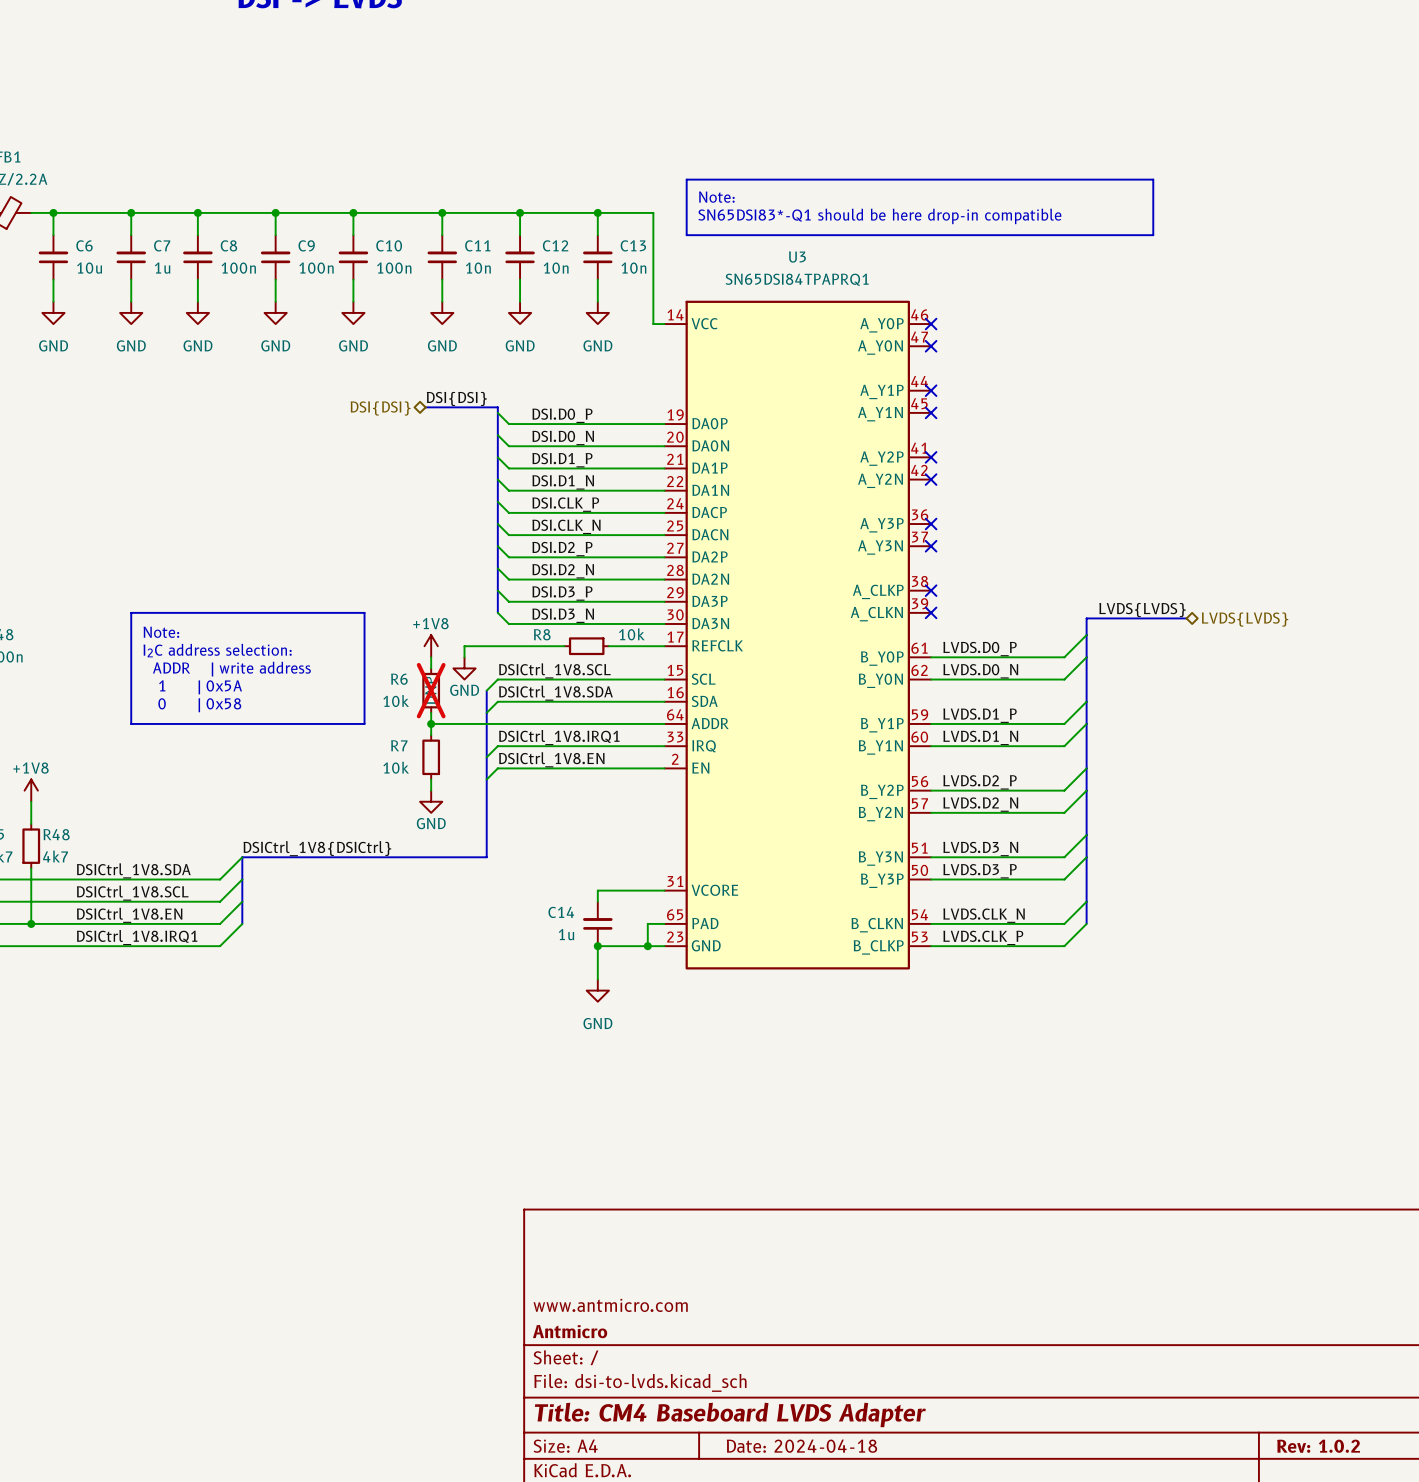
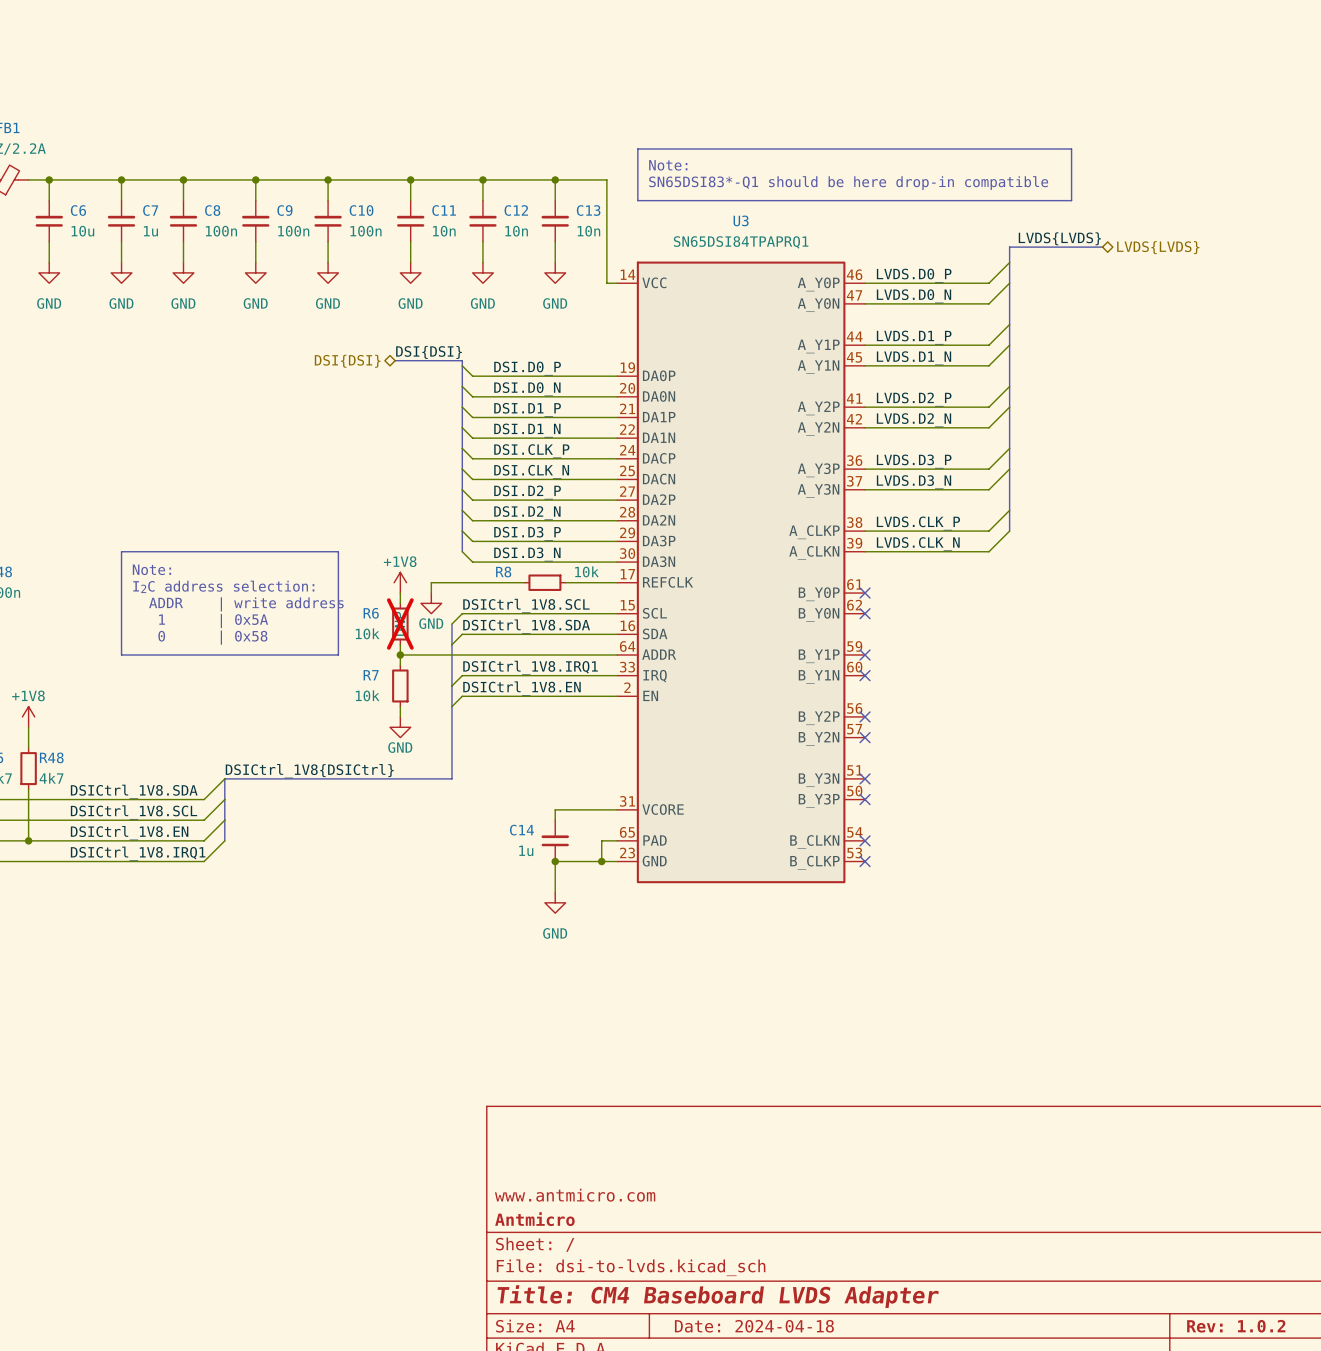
label: none -> LVDS{LVDS} (1059, 238)
bus: none -> (1102, 247) (1009, 247) (1009, 531)
hierarchical label: none -> LVDS{LVDS} (1158, 247)
wire: none -> (1009, 262) (988, 283) (865, 283)
label: none -> LVDS.D0_P (914, 275)
no-connect mark: (931, 324) -> none
wire: none -> (1009, 283) (988, 303) (865, 303)
label: none -> LVDS.D0_N (914, 296)
no-connect mark: (931, 346) -> none
wire: none -> (1009, 324) (988, 345) (865, 345)
label: none -> LVDS.D1_P (914, 337)
no-connect mark: (931, 390) -> none
wire: none -> (1009, 345) (988, 365) (865, 365)
label: none -> LVDS.D1_N (914, 358)
no-connect mark: (931, 412) -> none
label: none -> LVDS.D2_P (914, 399)
no-connect mark: (931, 457) -> none
label: none -> LVDS.D2_N (914, 420)
no-connect mark: (931, 479) -> none
label: none -> LVDS.D3_P (914, 461)
no-connect mark: (931, 524) -> none
label: none -> LVDS.D3_N (914, 482)
no-connect mark: (931, 546) -> none
label: none -> LVDS.CLK_P (918, 523)
no-connect mark: (931, 590) -> none
label: none -> LVDS.CLK_N (918, 544)
label: LVDS{LVDS} (1142, 610) -> none
no-connect mark: (931, 612) -> none
bus: (1186, 618) (1086, 618) (1086, 923) -> none
hierarchical label: LVDS{LVDS} (1245, 619) -> none
wire: (1086, 635) (1064, 657) (931, 657) -> (1009, 386) (988, 407) (865, 407)
label: LVDS.D0_P (980, 649) -> none
no-connect mark: none -> (865, 593)
wire: (1086, 657) (1064, 679) (931, 679) -> (1009, 407) (988, 427) (865, 427)
label: LVDS.D0_N (980, 671) -> none
no-connect mark: none -> (865, 613)
wire: (1086, 701) (1064, 723) (931, 723) -> (1009, 448) (988, 469) (865, 469)
label: LVDS.D1_P (980, 715) -> none
no-connect mark: none -> (865, 654)
wire: (1086, 723) (1064, 746) (931, 746) -> (1009, 469) (988, 489) (865, 489)
label: LVDS.D1_N (980, 737) -> none
no-connect mark: none -> (865, 675)
wire: (1086, 768) (1064, 790) (931, 790) -> (1009, 510) (988, 531) (865, 531)
label: LVDS.D2_P (980, 782) -> none
no-connect mark: none -> (865, 716)
wire: (1086, 790) (1064, 812) (931, 812) -> (1009, 531) (988, 551) (865, 551)
label: LVDS.D2_N (980, 804) -> none
no-connect mark: none -> (865, 737)
wire: (1086, 835) (1064, 857) (931, 857) -> none
label: LVDS.D3_N (980, 849) -> none
no-connect mark: none -> (865, 778)
wire: (1086, 857) (1064, 879) (931, 879) -> none
label: LVDS.D3_P (980, 871) -> none
no-connect mark: none -> (865, 799)
wire: (1086, 901) (1064, 923) (931, 923) -> none
label: LVDS.CLK_N (984, 915) -> none
no-connect mark: none -> (865, 840)
wire: (1086, 923) (1064, 946) (931, 946) -> none
label: LVDS.CLK_P (983, 937) -> none
no-connect mark: none -> (865, 861)

